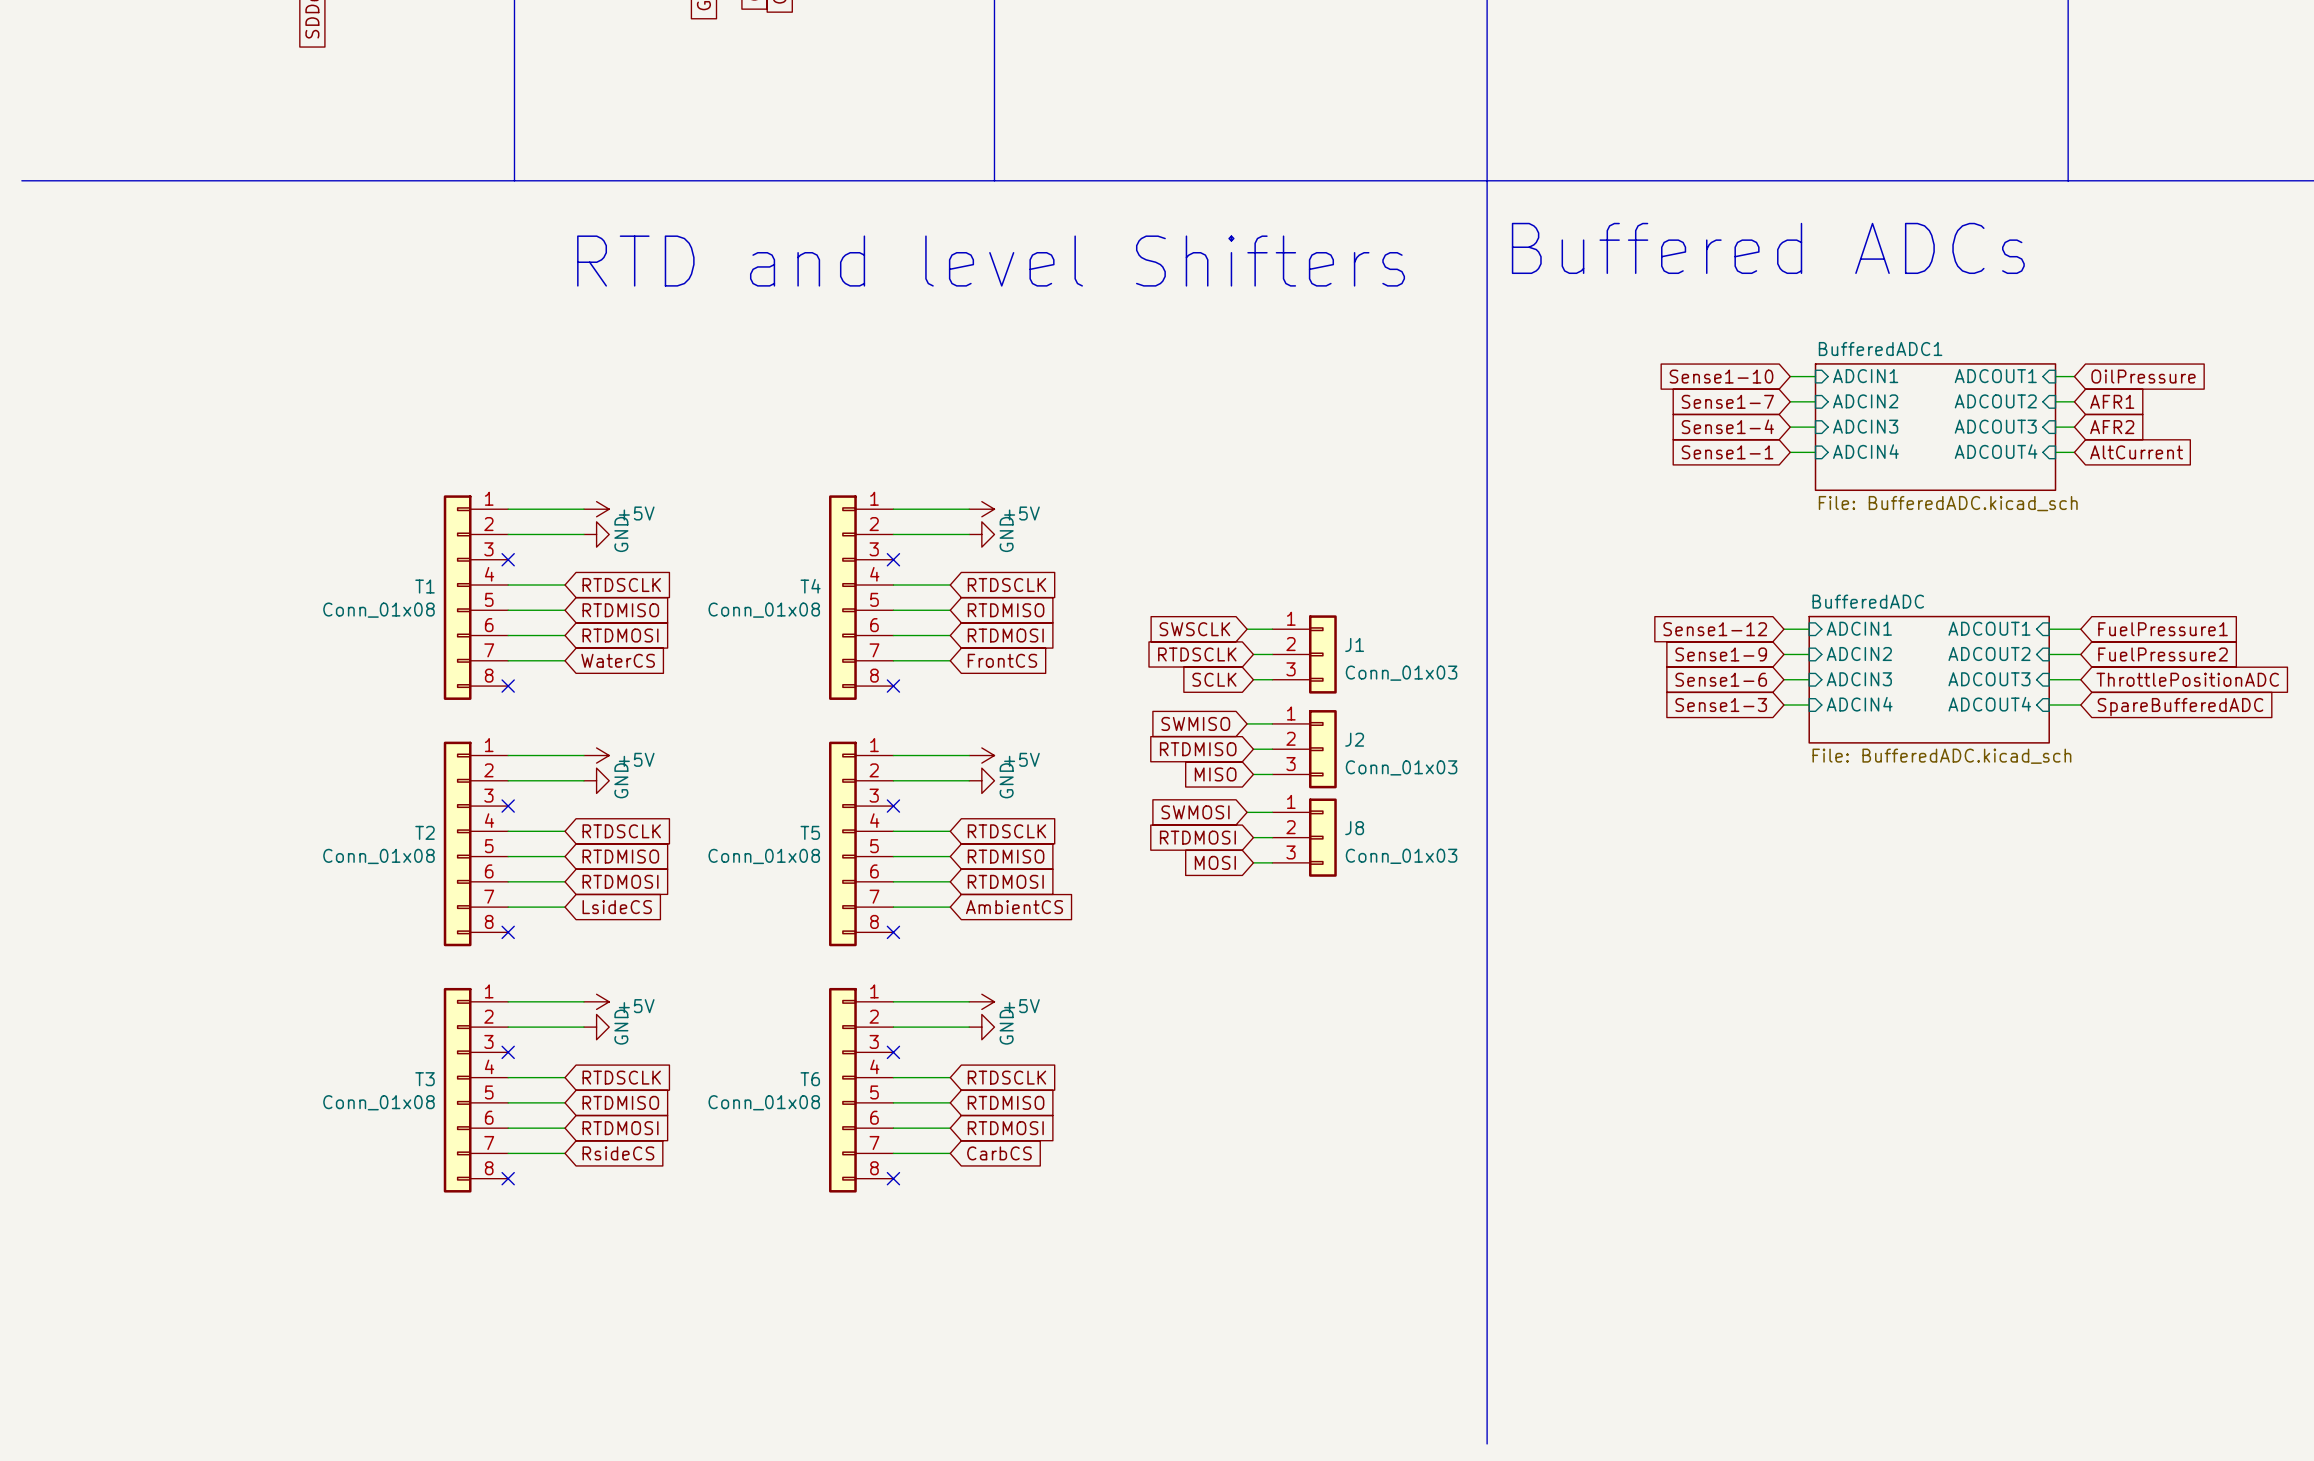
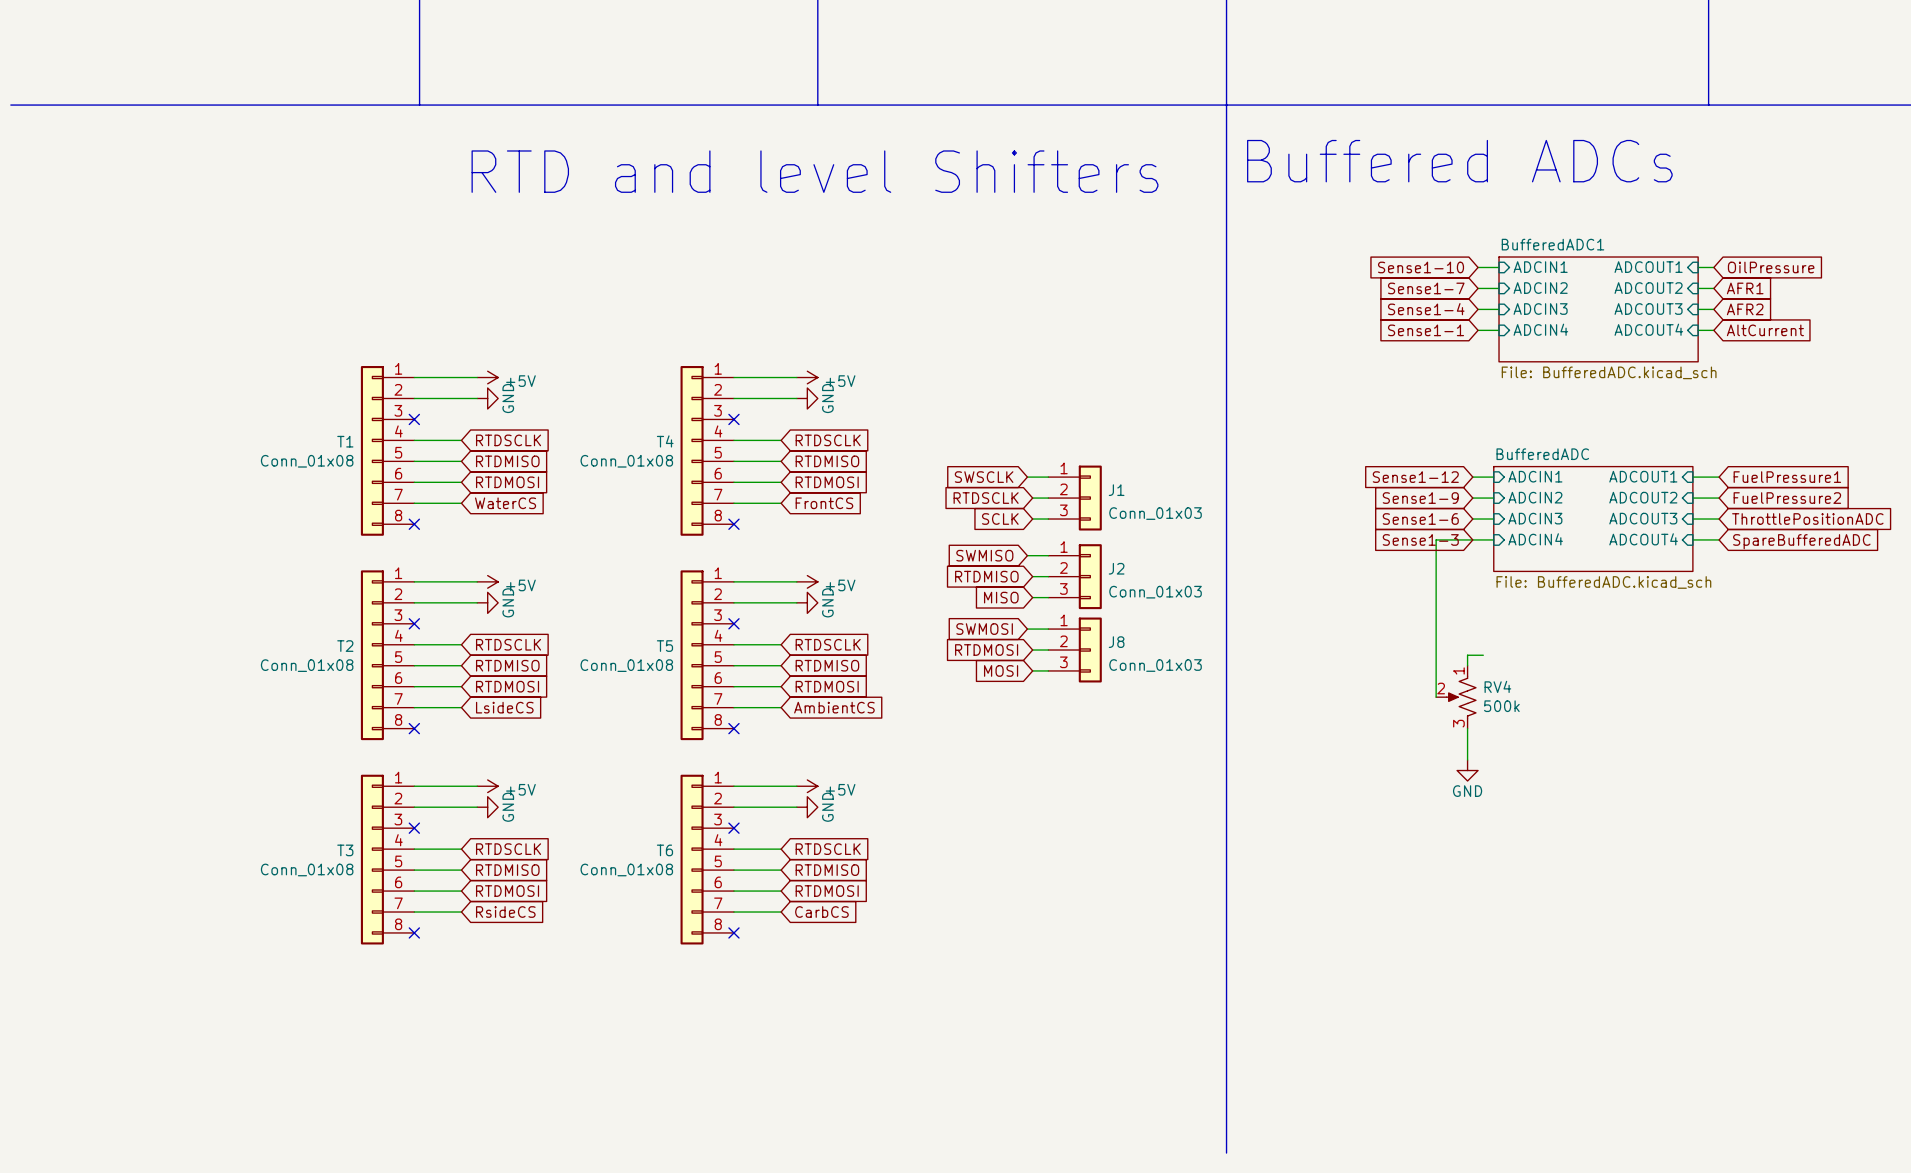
wire: none -> (1472, 539) (1436, 539) (1436, 697)
wire: none -> (1483, 655) (1467, 655) (1467, 665)
RV4: none -> 500k (1456, 697)
wire: none -> (1467, 728) (1467, 760)
power symbol: none -> GND (1467, 770)

